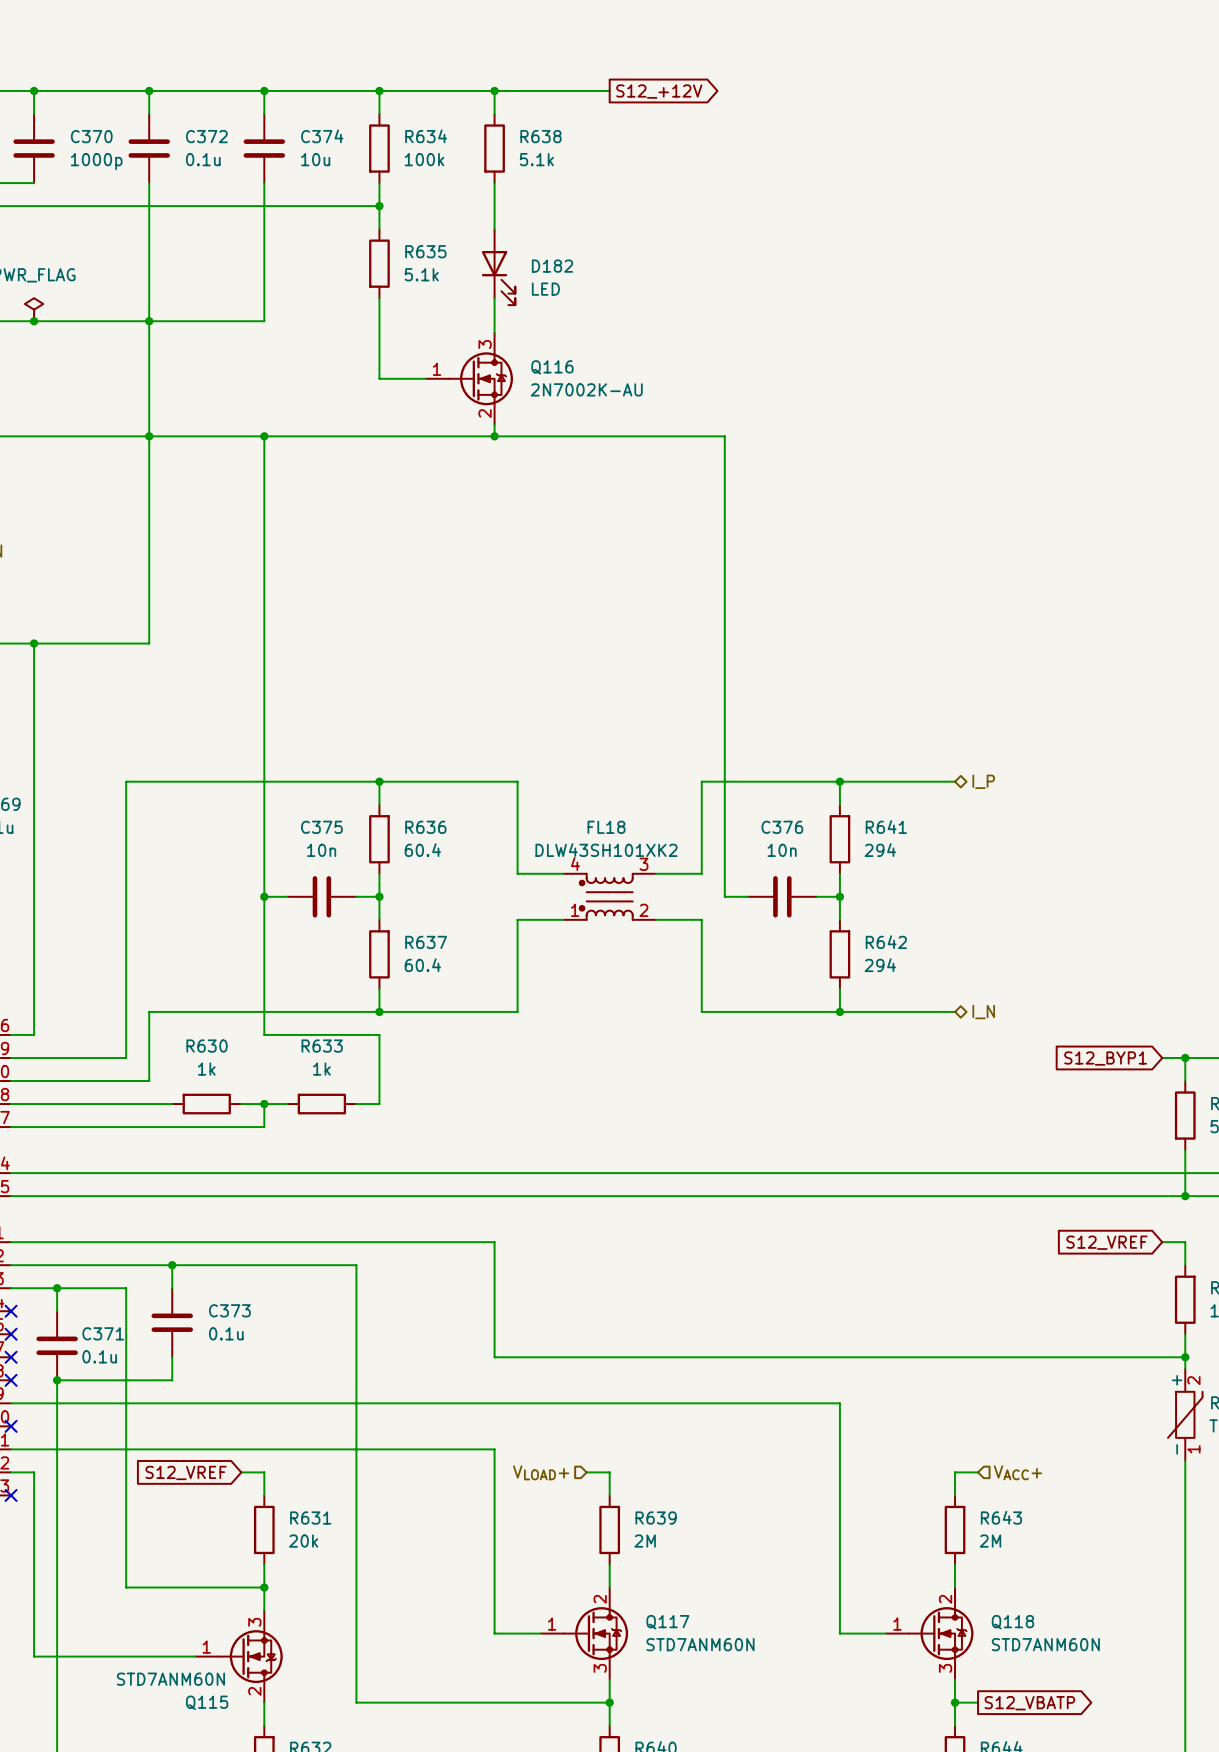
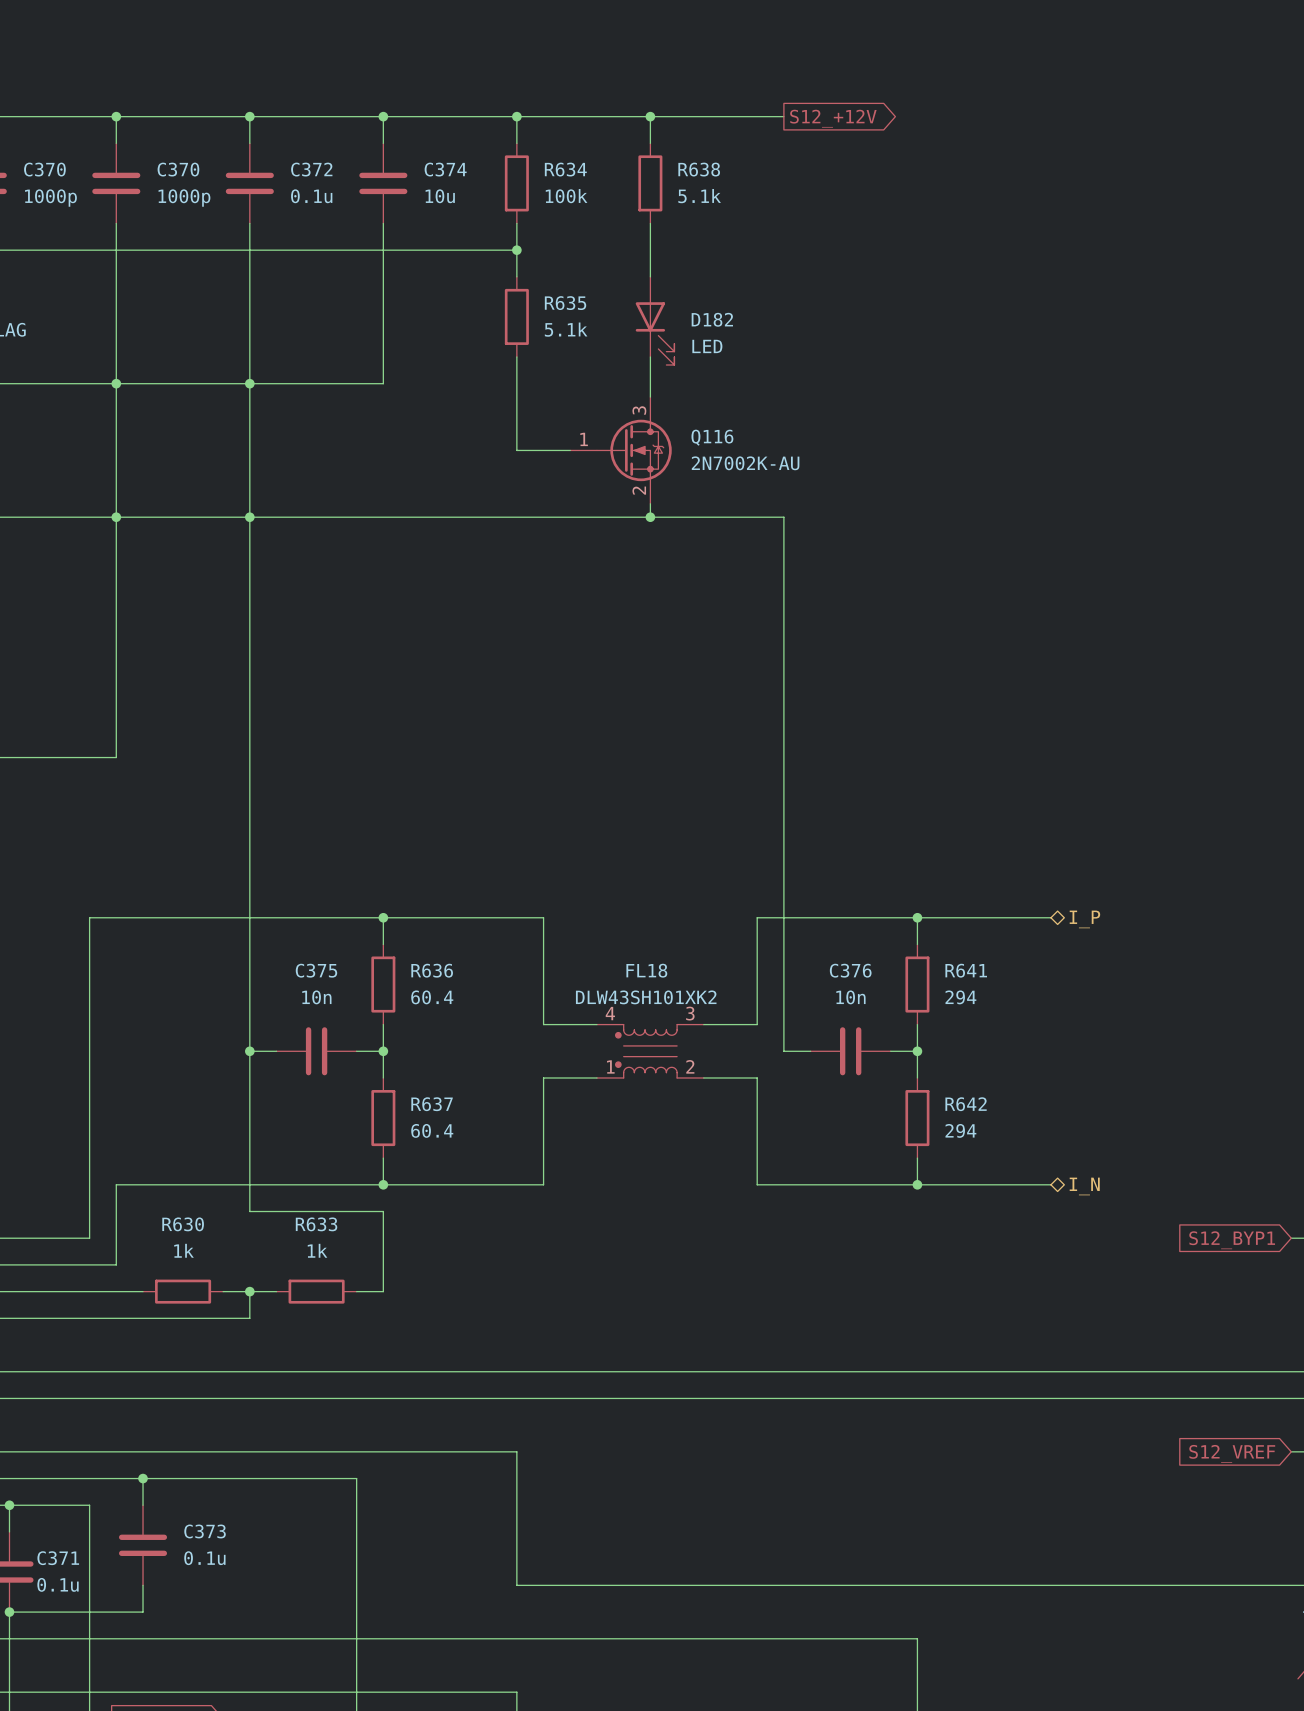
junction: none -> (650, 116)
wire: none -> (783, 116) (650, 116) (650, 143)
global label position: S12_+12V (659, 91) -> S12_+12V (833, 118)
C372 name: C372 (206, 136) -> C370 (178, 169)
C374 name: C374 (322, 136) -> C372 (311, 169)
R638 name: R638 (540, 136) -> R634 (565, 169)
R634: 100k (379, 148) -> none
C374: none -> 10u (383, 183)
R638: none -> 5.1k (650, 183)
C372 value: 0.1u (203, 159) -> 1000p (184, 198)
C374 value: 10u (315, 159) -> 0.1u (311, 196)
R638 value: 5.1k (536, 159) -> 100k (566, 196)
wire: none -> (650, 223) (650, 276)
wire: none -> (383, 250) (516, 250)
junction: (379, 206) -> none
junction: none -> (516, 250)
wire: none -> (383, 276) (383, 356)
R635 position: (379, 263) -> (516, 316)
D182 position: (498, 267) -> (655, 320)
wire: none -> (650, 356) (650, 397)
junction: none -> (249, 383)
wire: (379, 321) (379, 378) (425, 378) -> (383, 383) (249, 383) (249, 517)
wire: none -> (516, 397) (516, 450) (570, 450)
Q116 position: (469, 378) -> (621, 450)
wire: (494, 424) (494, 436) -> (650, 503) (650, 517)
junction: (494, 436) -> none
junction: none -> (650, 517)

